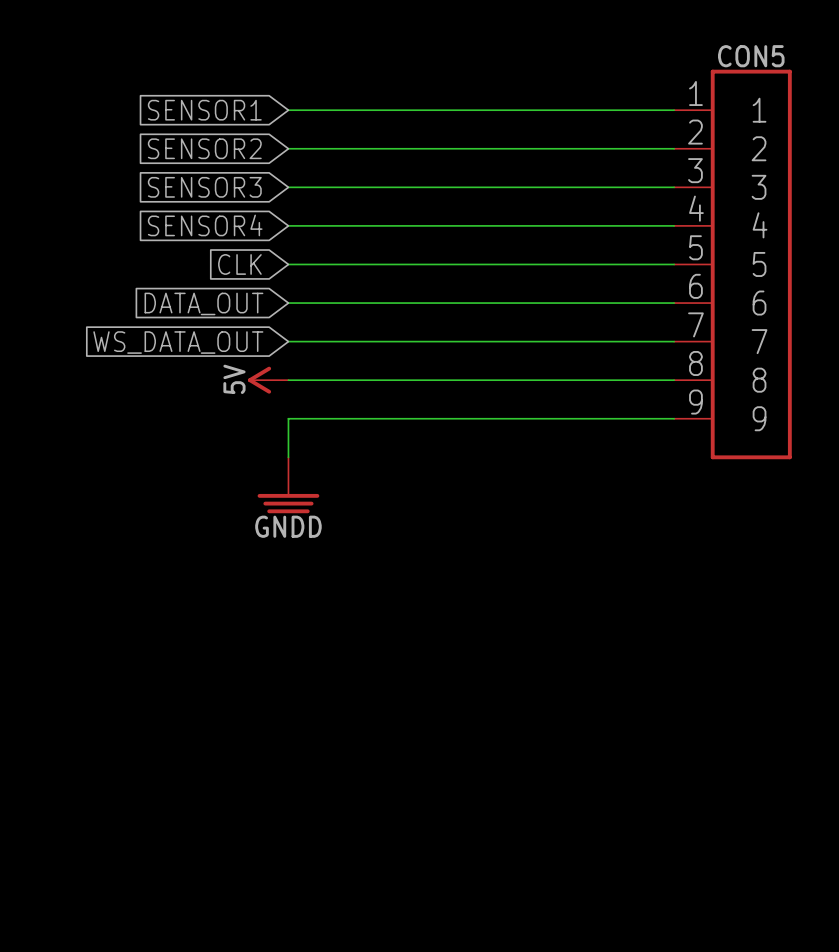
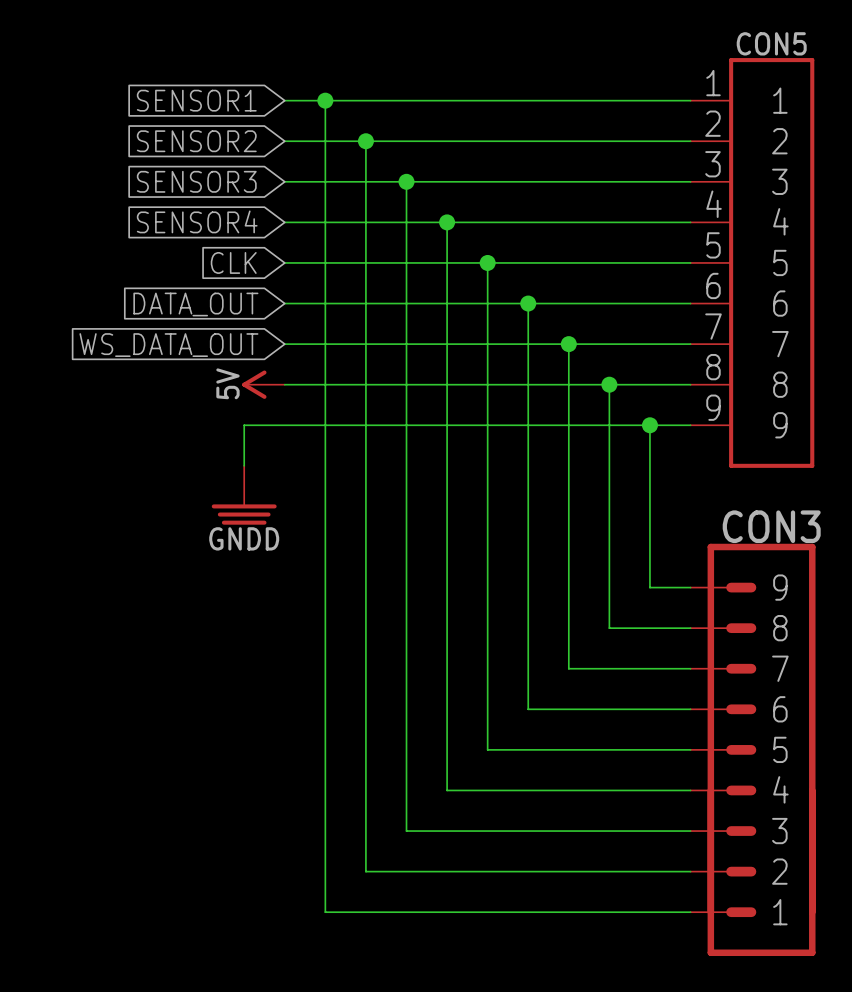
wire: none -> (325, 100) (325, 912) (690, 912)
junction: none -> (325, 100)
wire: none -> (365, 141) (365, 871) (690, 871)
junction: none -> (365, 141)
wire: none -> (406, 181) (406, 831) (690, 831)
junction: none -> (406, 181)
wire: none -> (447, 222) (447, 790) (690, 790)
junction: none -> (447, 222)
wire: none -> (487, 262) (487, 749) (690, 749)
junction: none -> (487, 262)
wire: none -> (528, 303) (528, 709) (690, 709)
junction: none -> (528, 303)
wire: none -> (568, 344) (568, 668) (690, 668)
junction: none -> (568, 344)
wire: none -> (609, 384) (609, 628) (690, 628)
junction: none -> (609, 384)
wire: (288, 418) (288, 457) -> (284, 425) (244, 425) (244, 465)
wire: none -> (649, 425) (649, 587) (690, 587)
junction: none -> (649, 425)
power symbol position: GNDD (288, 485) -> GNDD (244, 495)
CON3: none -> (753, 749)

